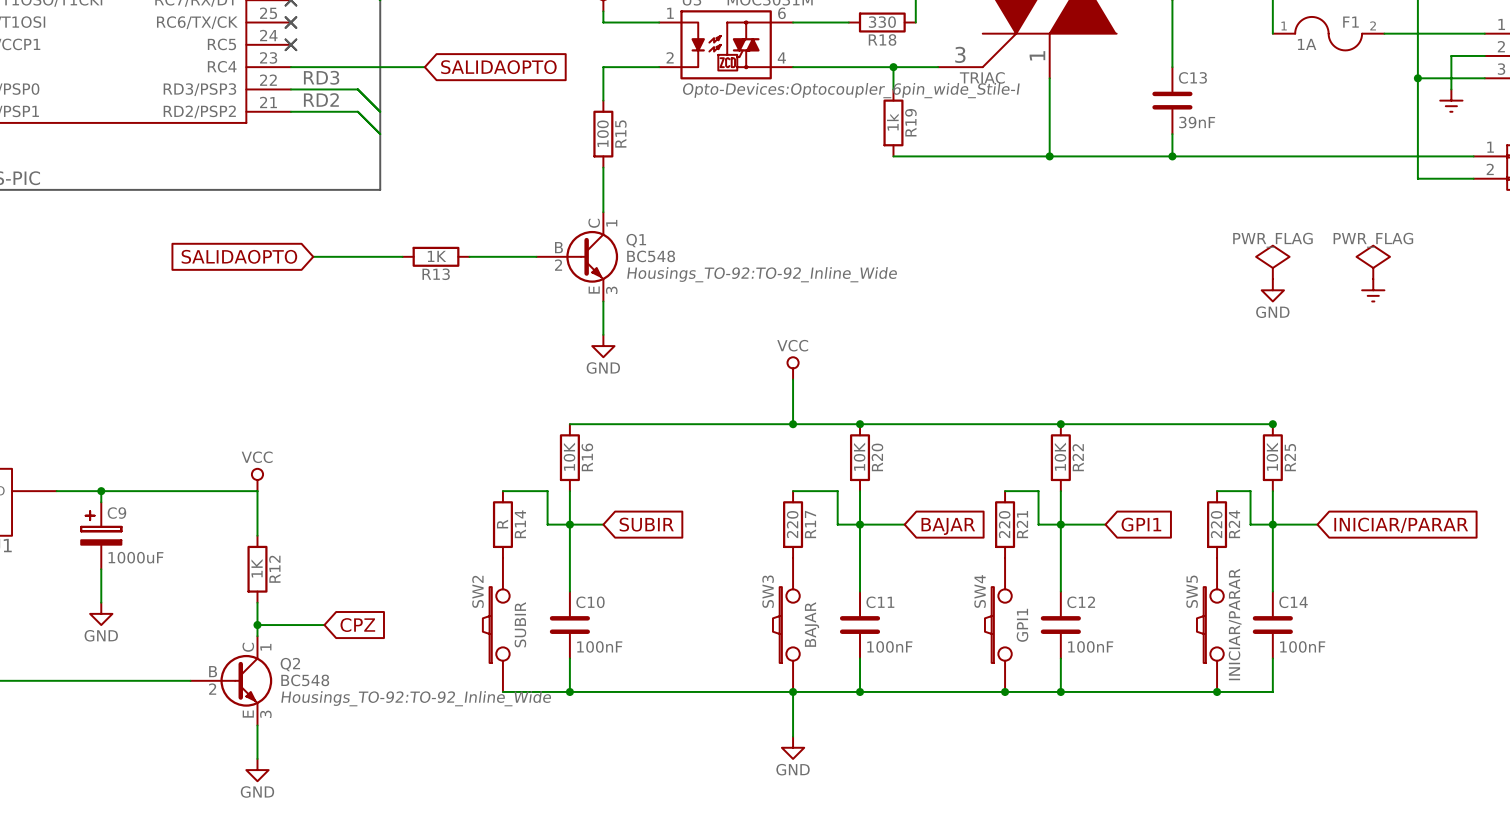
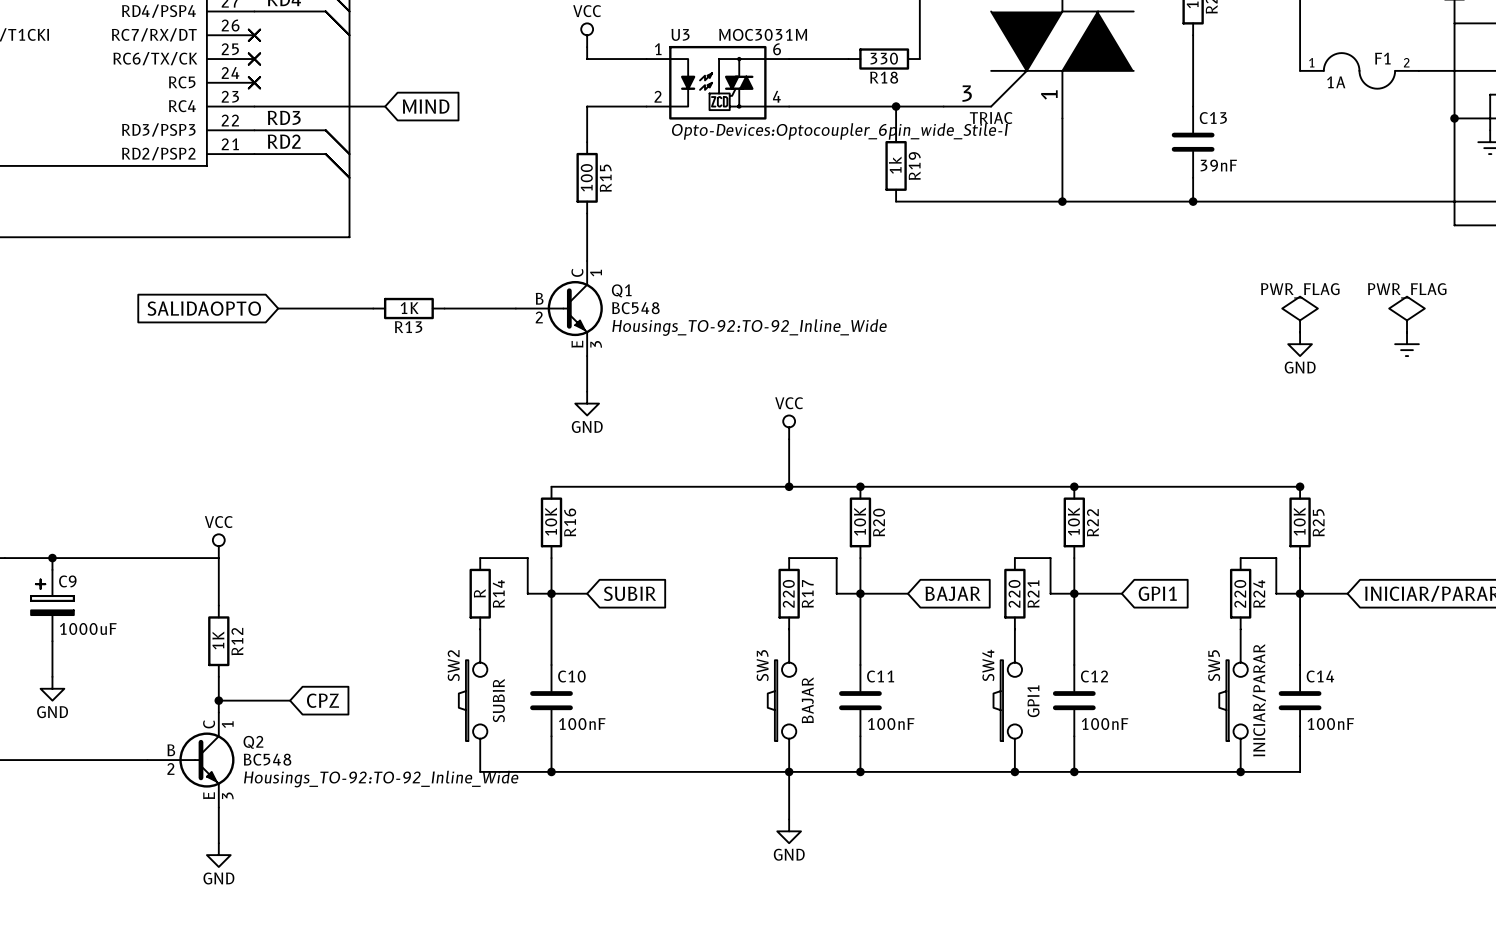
wire: (413, 67) (424, 67) -> none
global label: none -> MIND (426, 106)
global label: SALIDAOPTO (498, 67) -> none

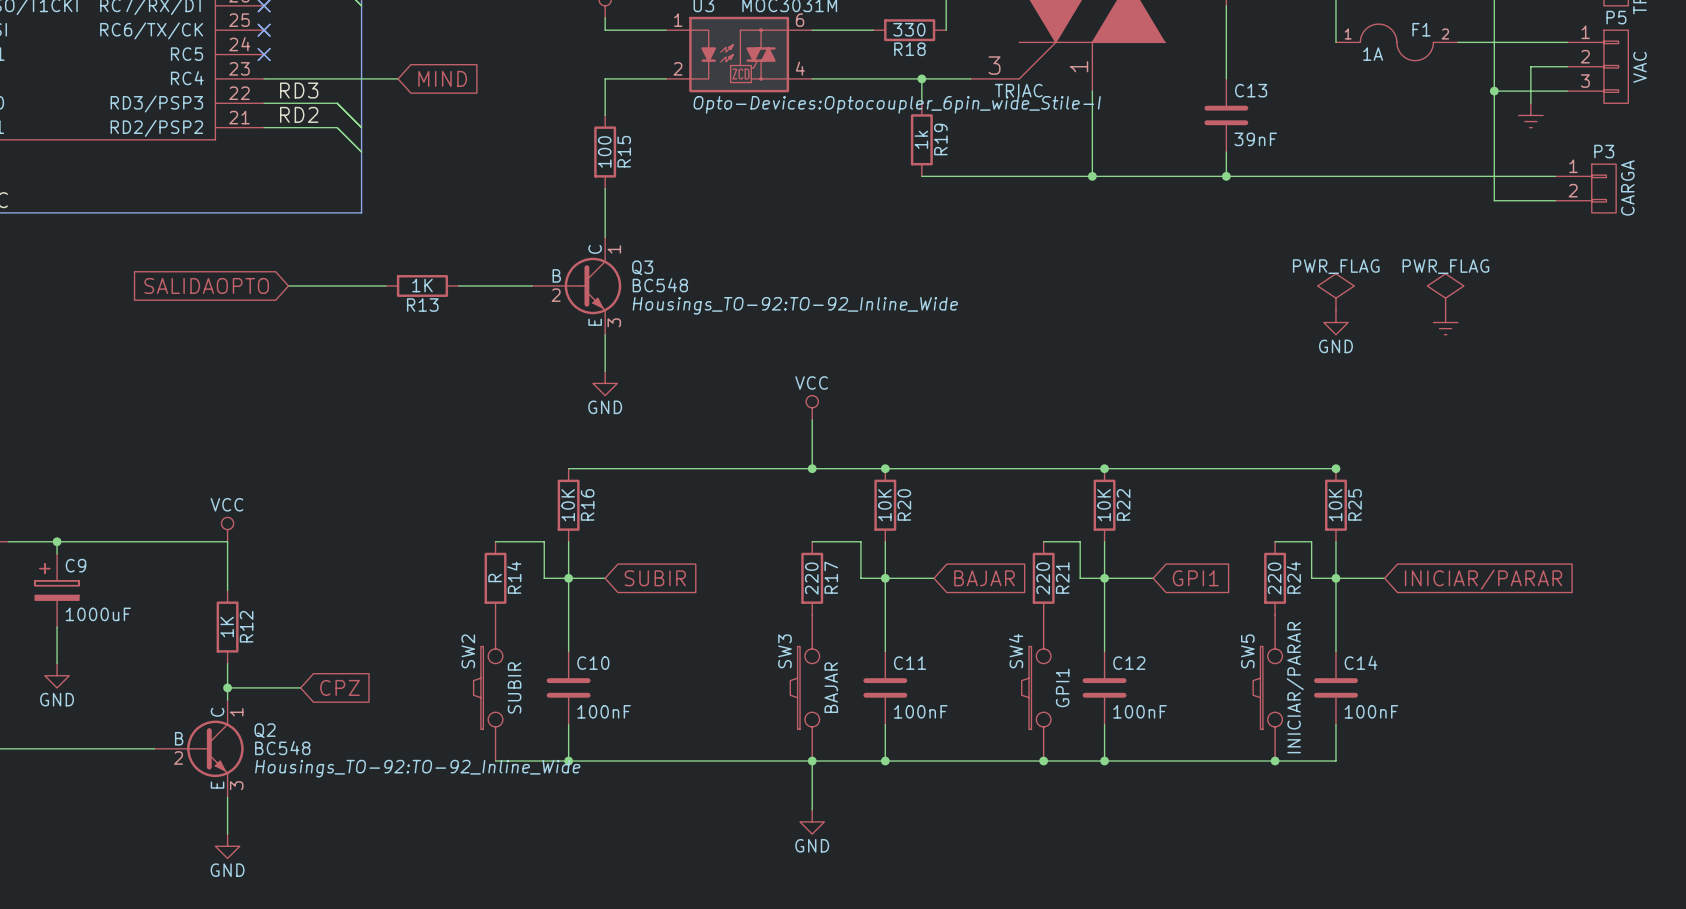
Q1 name: Q1 (621, 290) -> Q3 (642, 267)

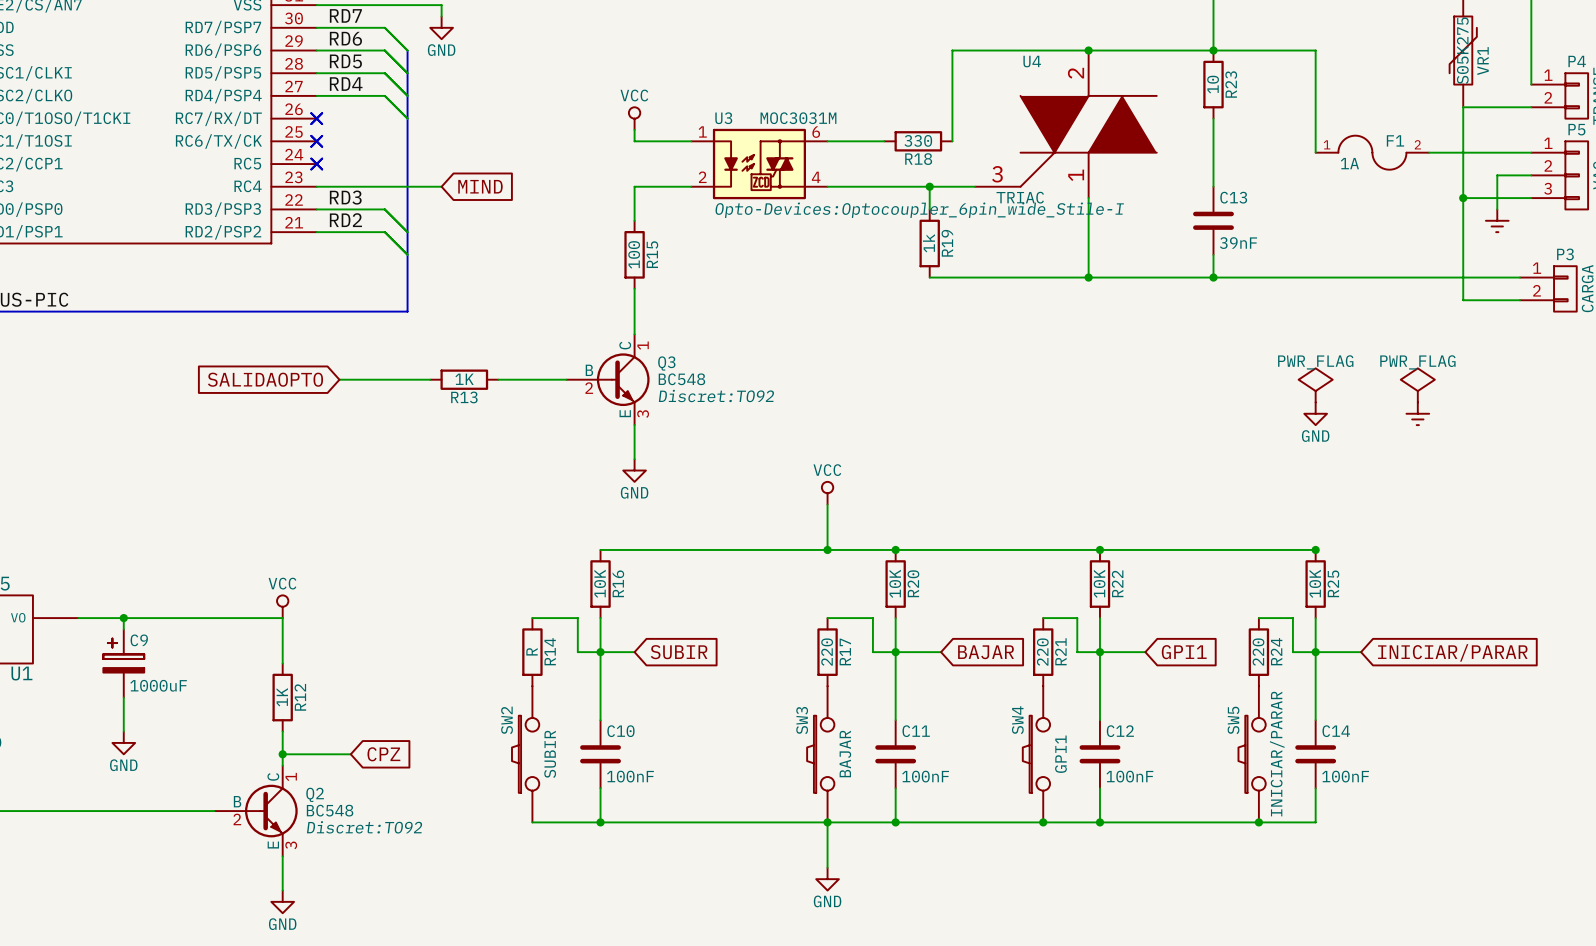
Q3 text: Housings_TO-92:TO-92_Inline_Wide (795, 305) -> Discret:TO92 (716, 396)
Q2 text: Housings_TO-92:TO-92_Inline_Wide (417, 768) -> Discret:TO92 (364, 827)

